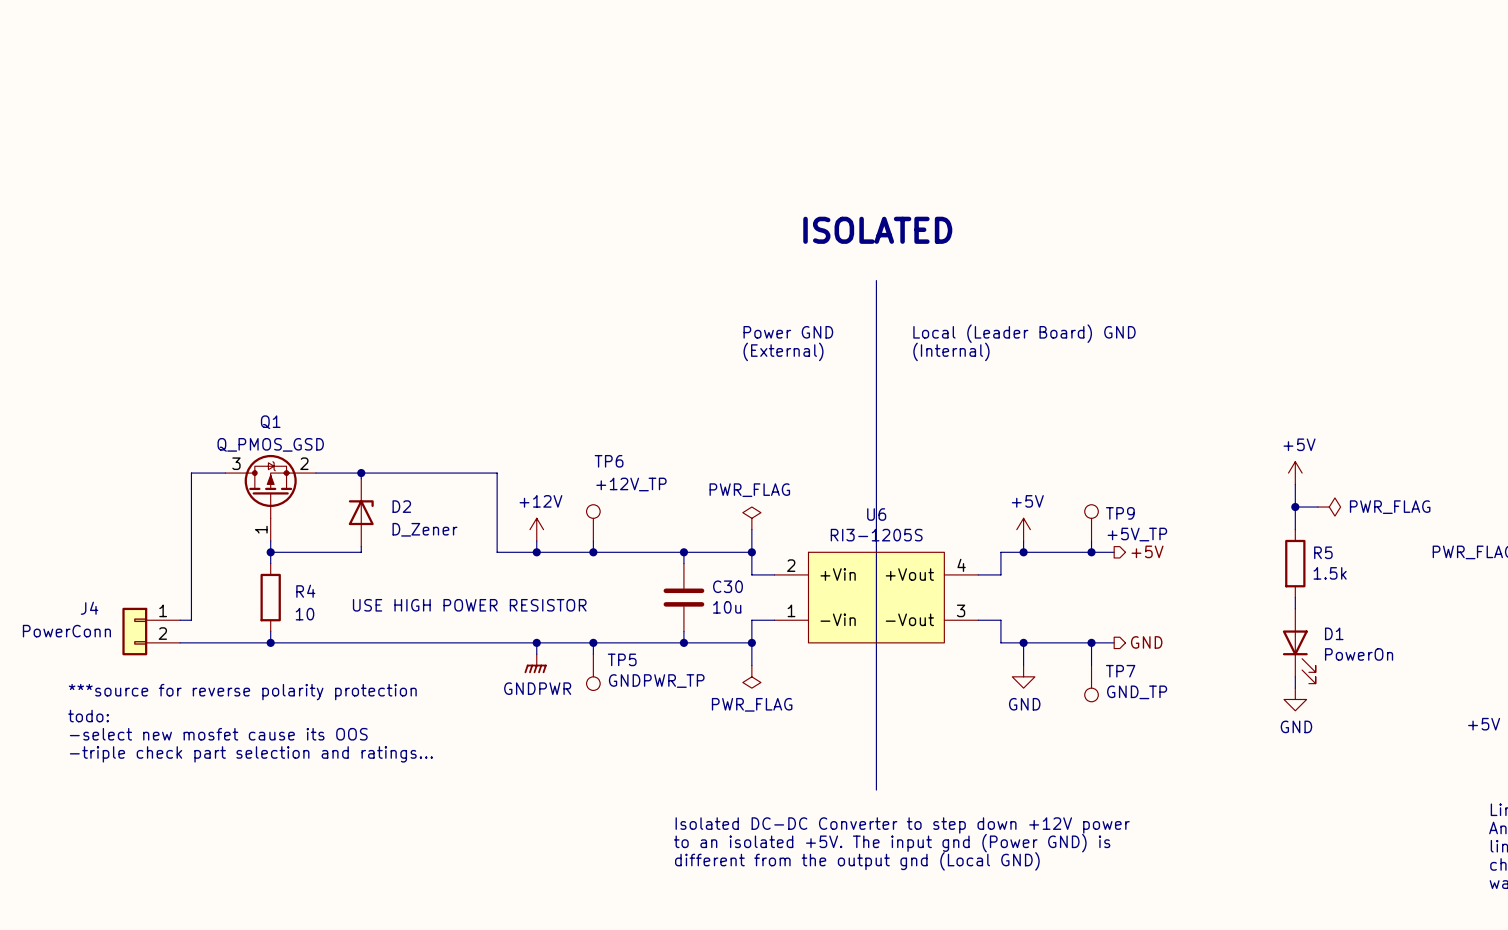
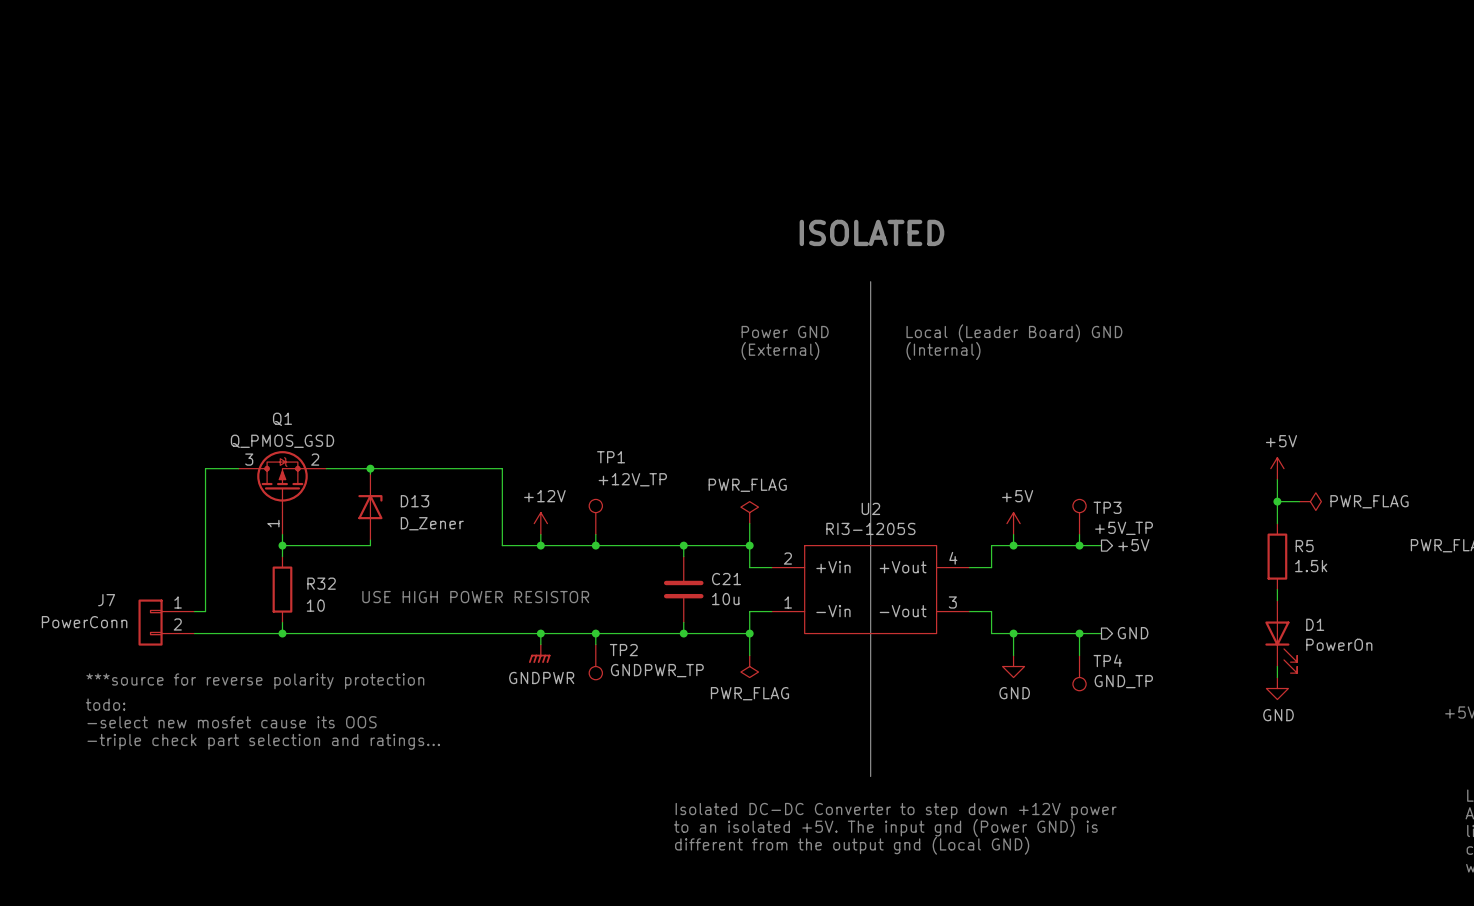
TP6 name: TP6 (609, 461) -> TP1 (611, 457)
D2 name: D2 (401, 506) -> D13 (415, 501)
TP9 name: TP9 (1120, 513) -> TP3 (1107, 507)
U6 name: U6 (876, 514) -> U2 (870, 508)
C30 name: C30 (728, 586) -> C21 (726, 579)
R4 name: R4 (305, 591) -> R32 (321, 583)
J4 name: J4 (89, 608) -> J7 (106, 600)
TP5 name: TP5 (622, 659) -> TP2 (623, 650)
TP7 name: TP7 (1120, 671) -> TP4 (1107, 660)

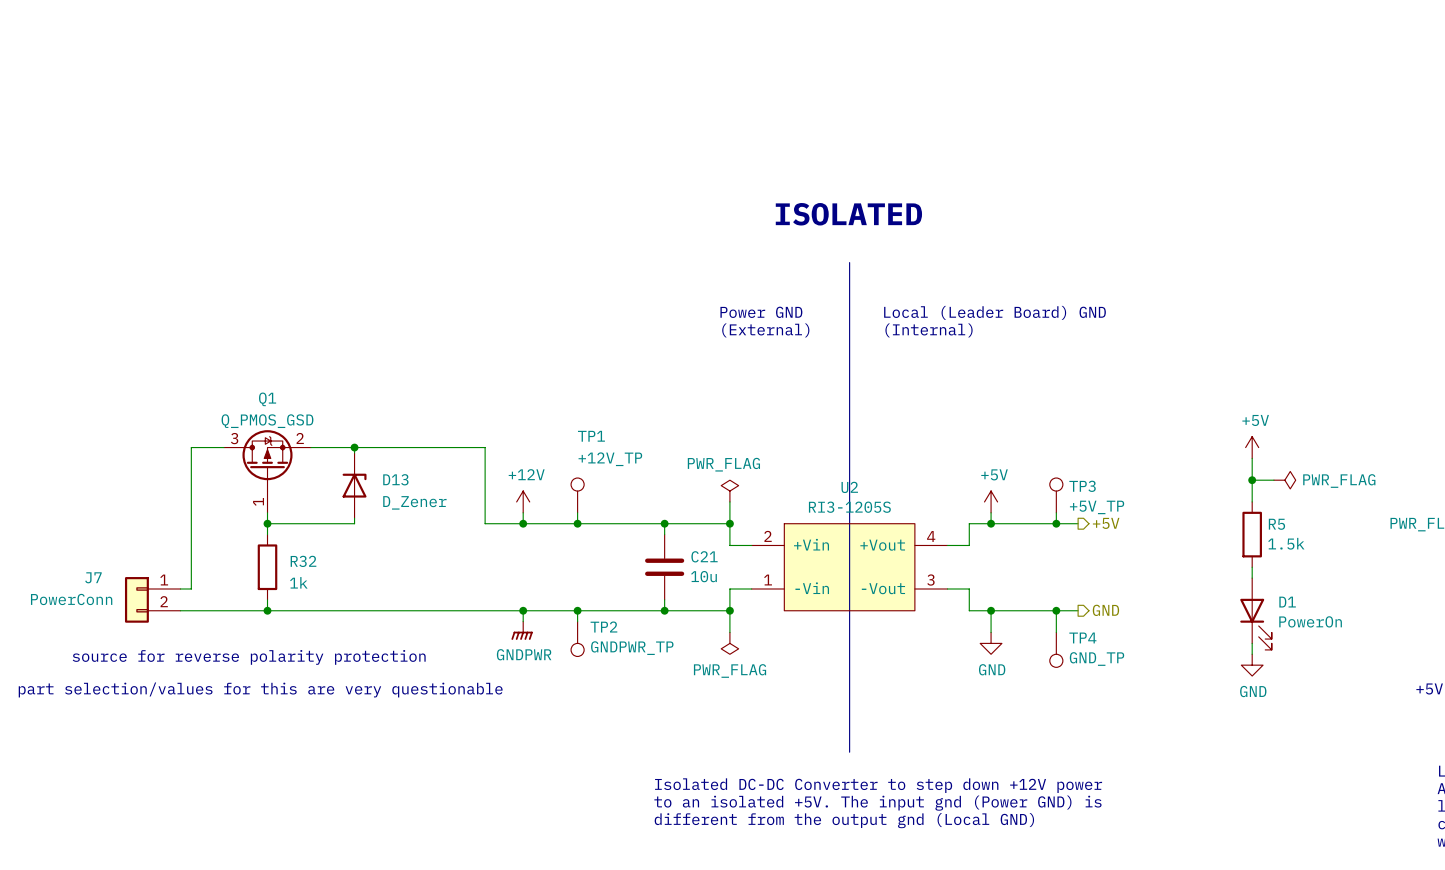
text: USE HIGH POWER RESISTOR (475, 597) -> none
R32 value: 10 (315, 605) -> 1k (298, 582)
text: ***source for reverse polarity protection (255, 681) -> source for reverse polarity protection (249, 657)
text: todo: (105, 704) -> none
text: none -> part selection/values for this are very questionable (260, 689)
text: -select new mosfet cause its OOS (232, 722) -> none
text: -triple check part selection and ratings... (263, 741) -> none

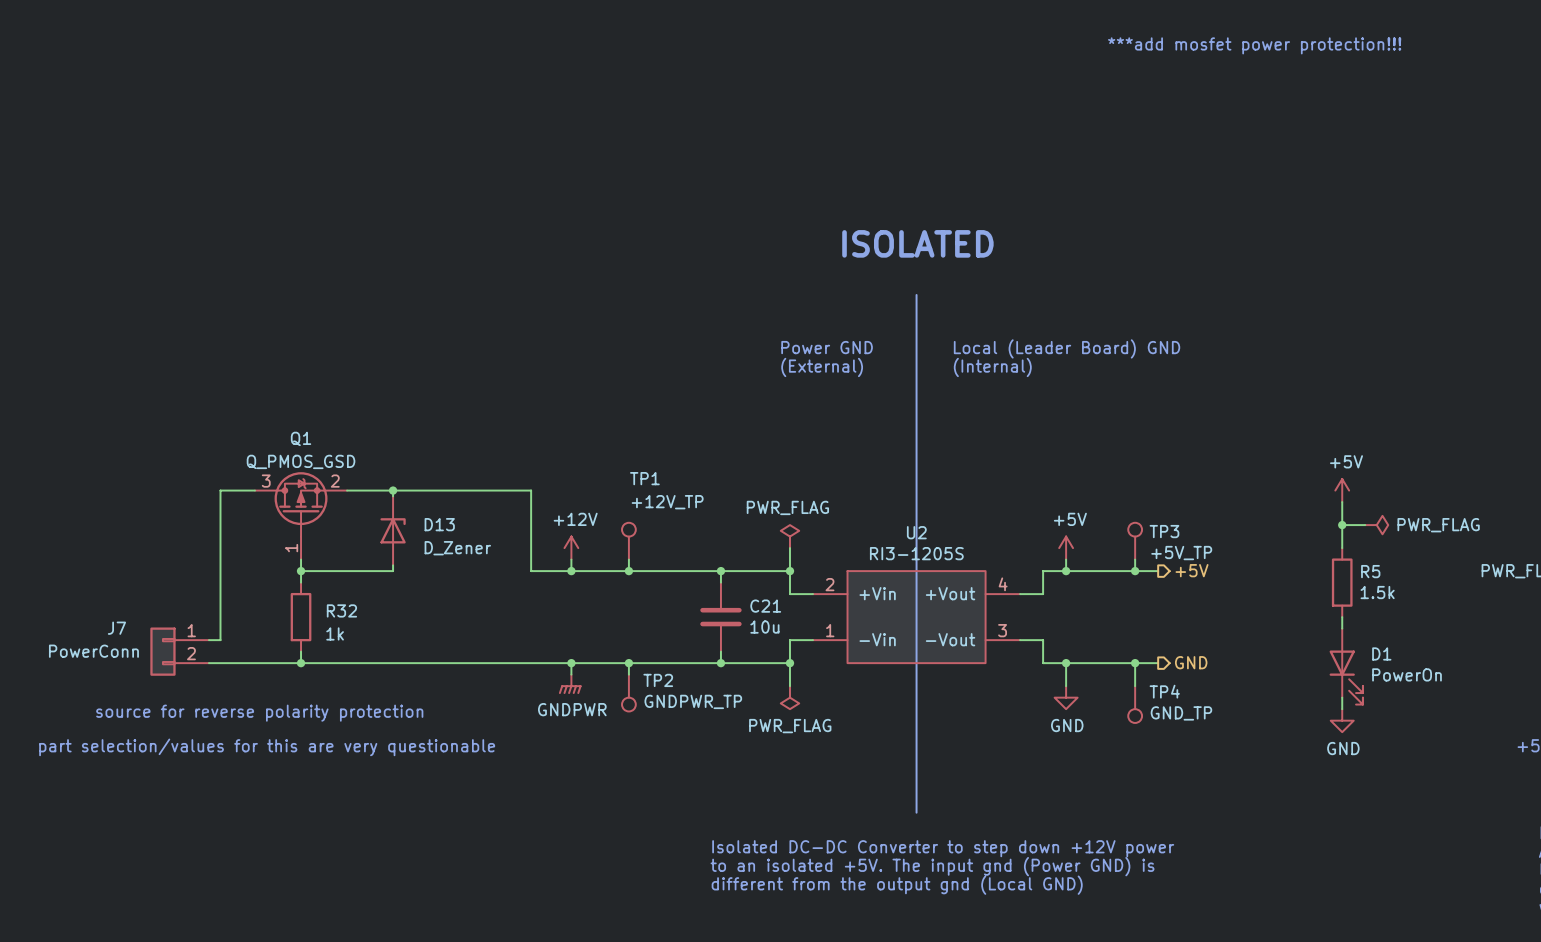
text: none -> ***add mosfet power protection!!! (1254, 45)

